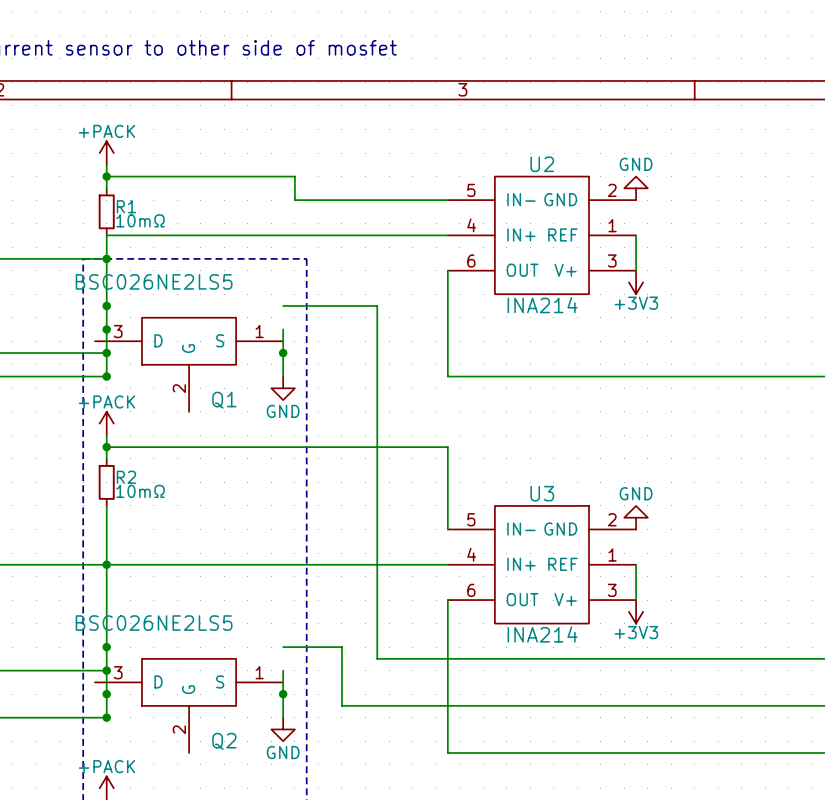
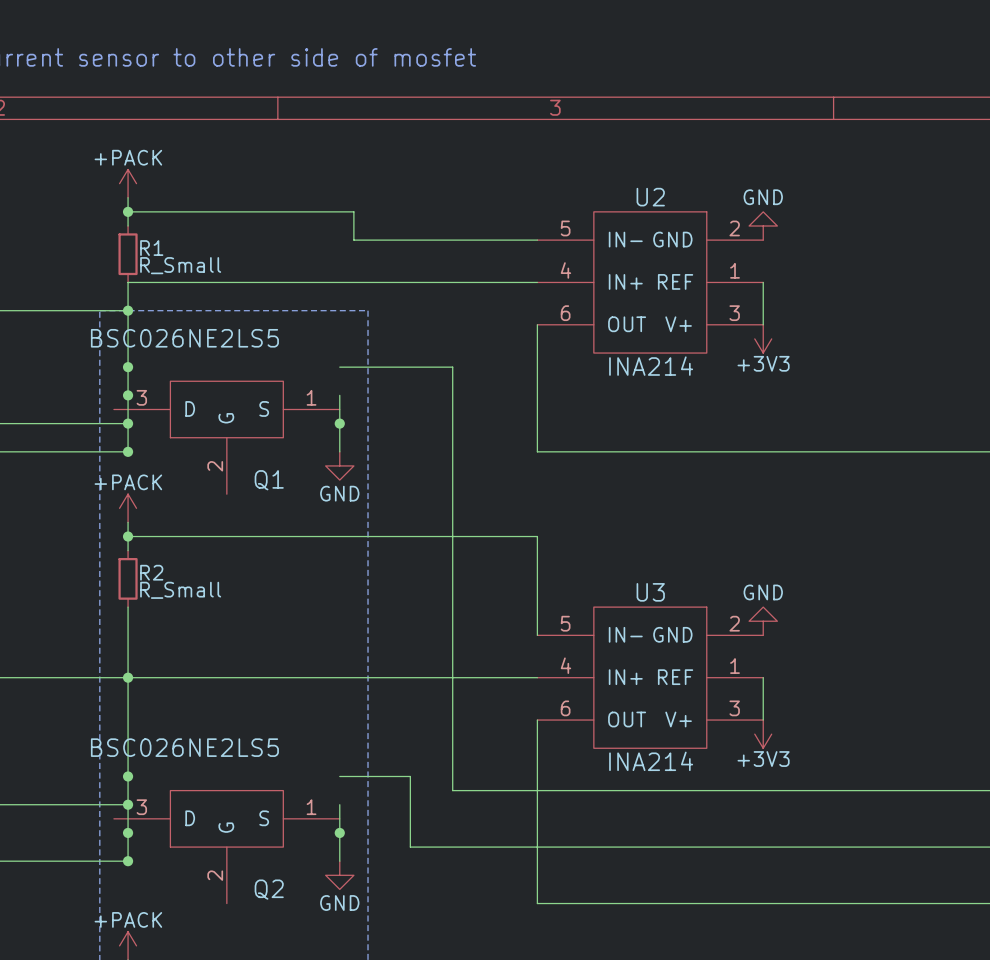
R1 value: 10mΩ (140, 220) -> R_Small (180, 265)
R2 value: 10mΩ (140, 491) -> R_Small (180, 590)

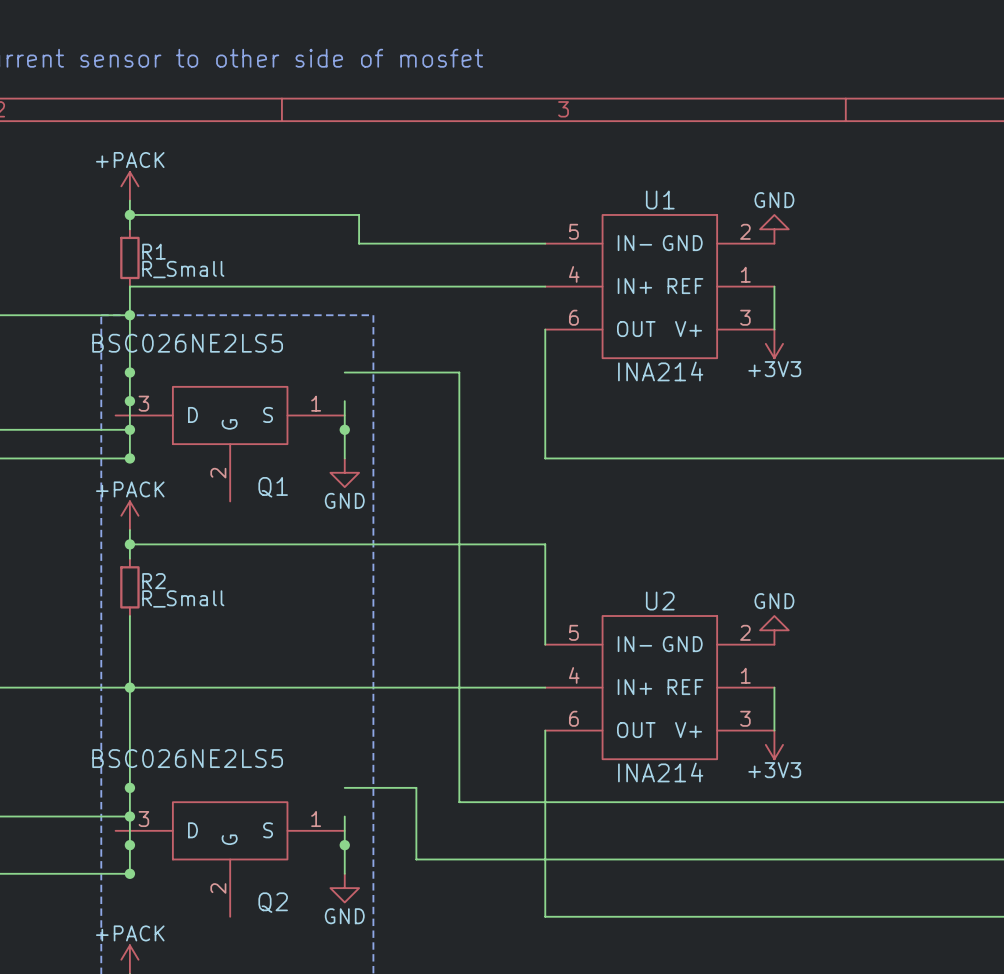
U2 name: U2 (650, 197) -> U1 (660, 200)
U3 name: U3 (650, 592) -> U2 (660, 601)

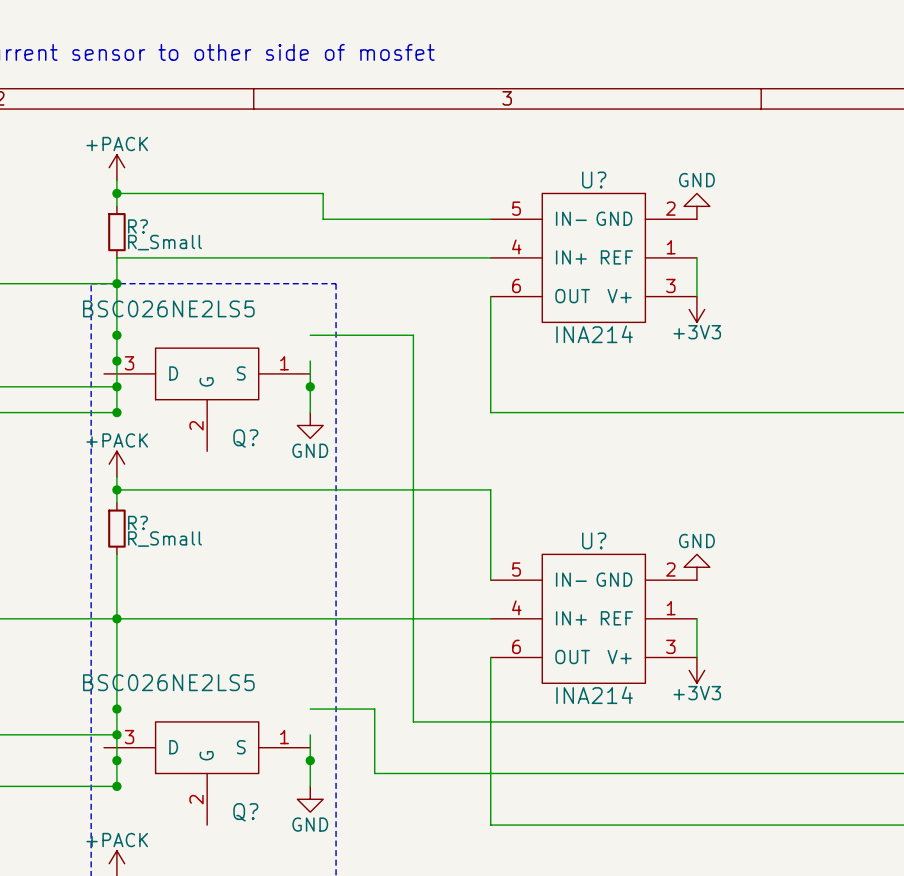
U1 name: U1 (660, 200) -> U? (594, 180)
R1 name: R1 (153, 251) -> R? (137, 226)
Q1 name: Q1 (273, 487) -> Q? (245, 438)
R2 name: R2 (153, 581) -> R? (137, 522)
U2 name: U2 (660, 601) -> U? (594, 540)
Q2 name: Q2 (273, 902) -> Q? (245, 812)

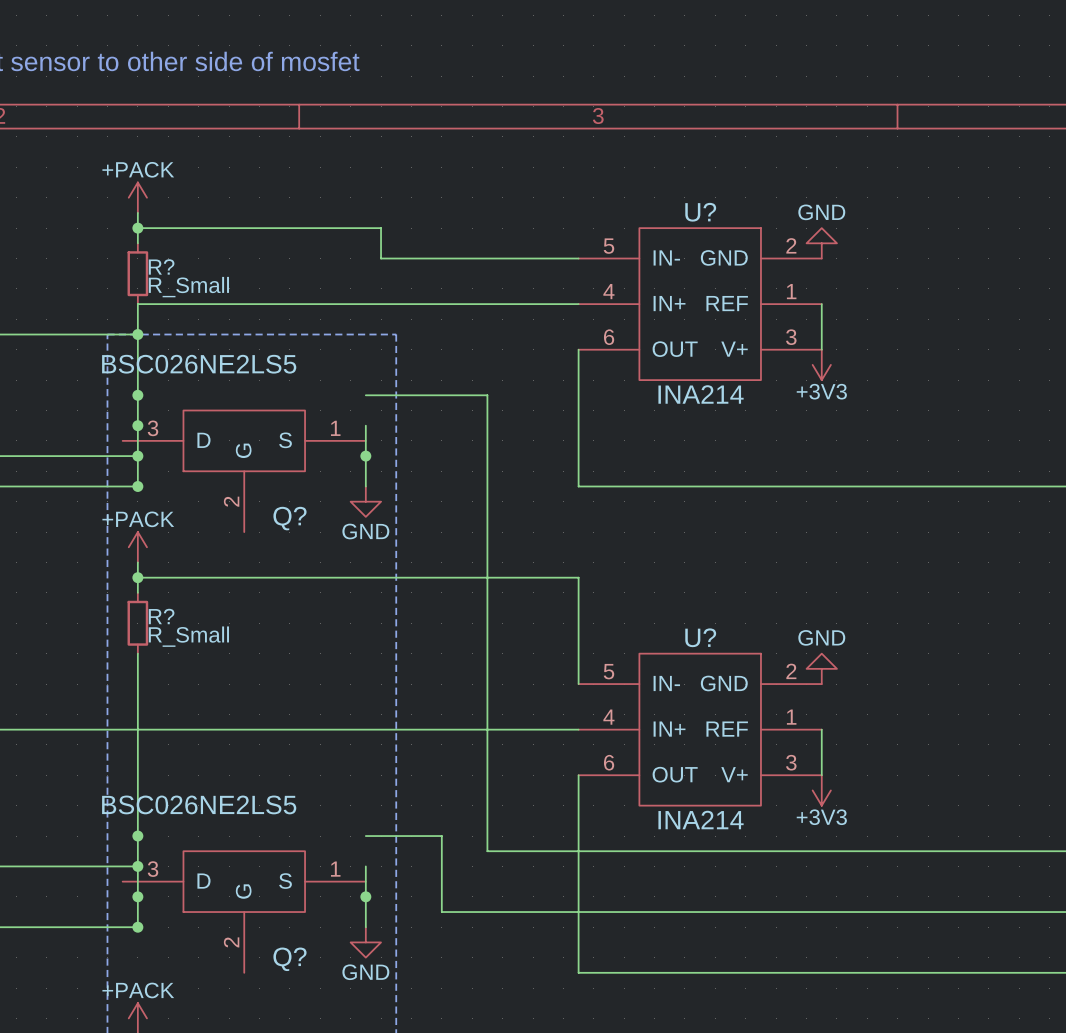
junction: (116, 618) -> none

